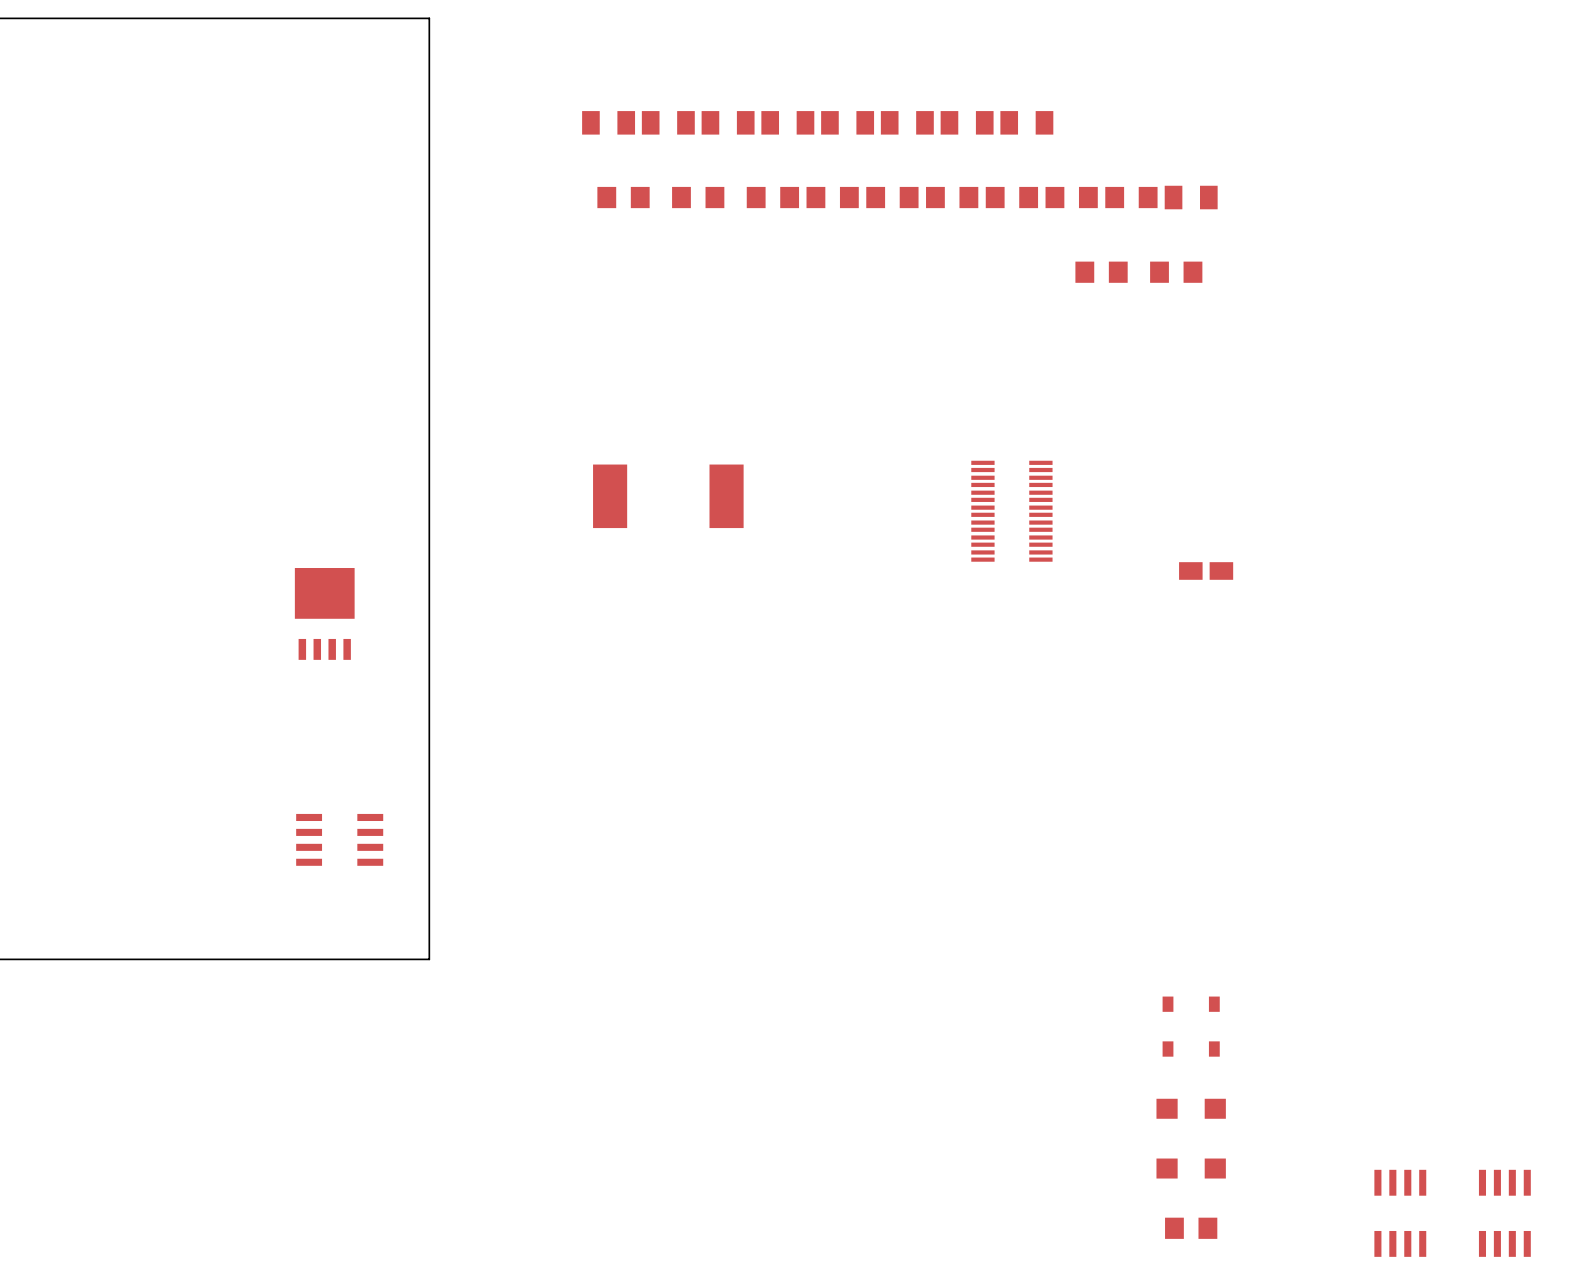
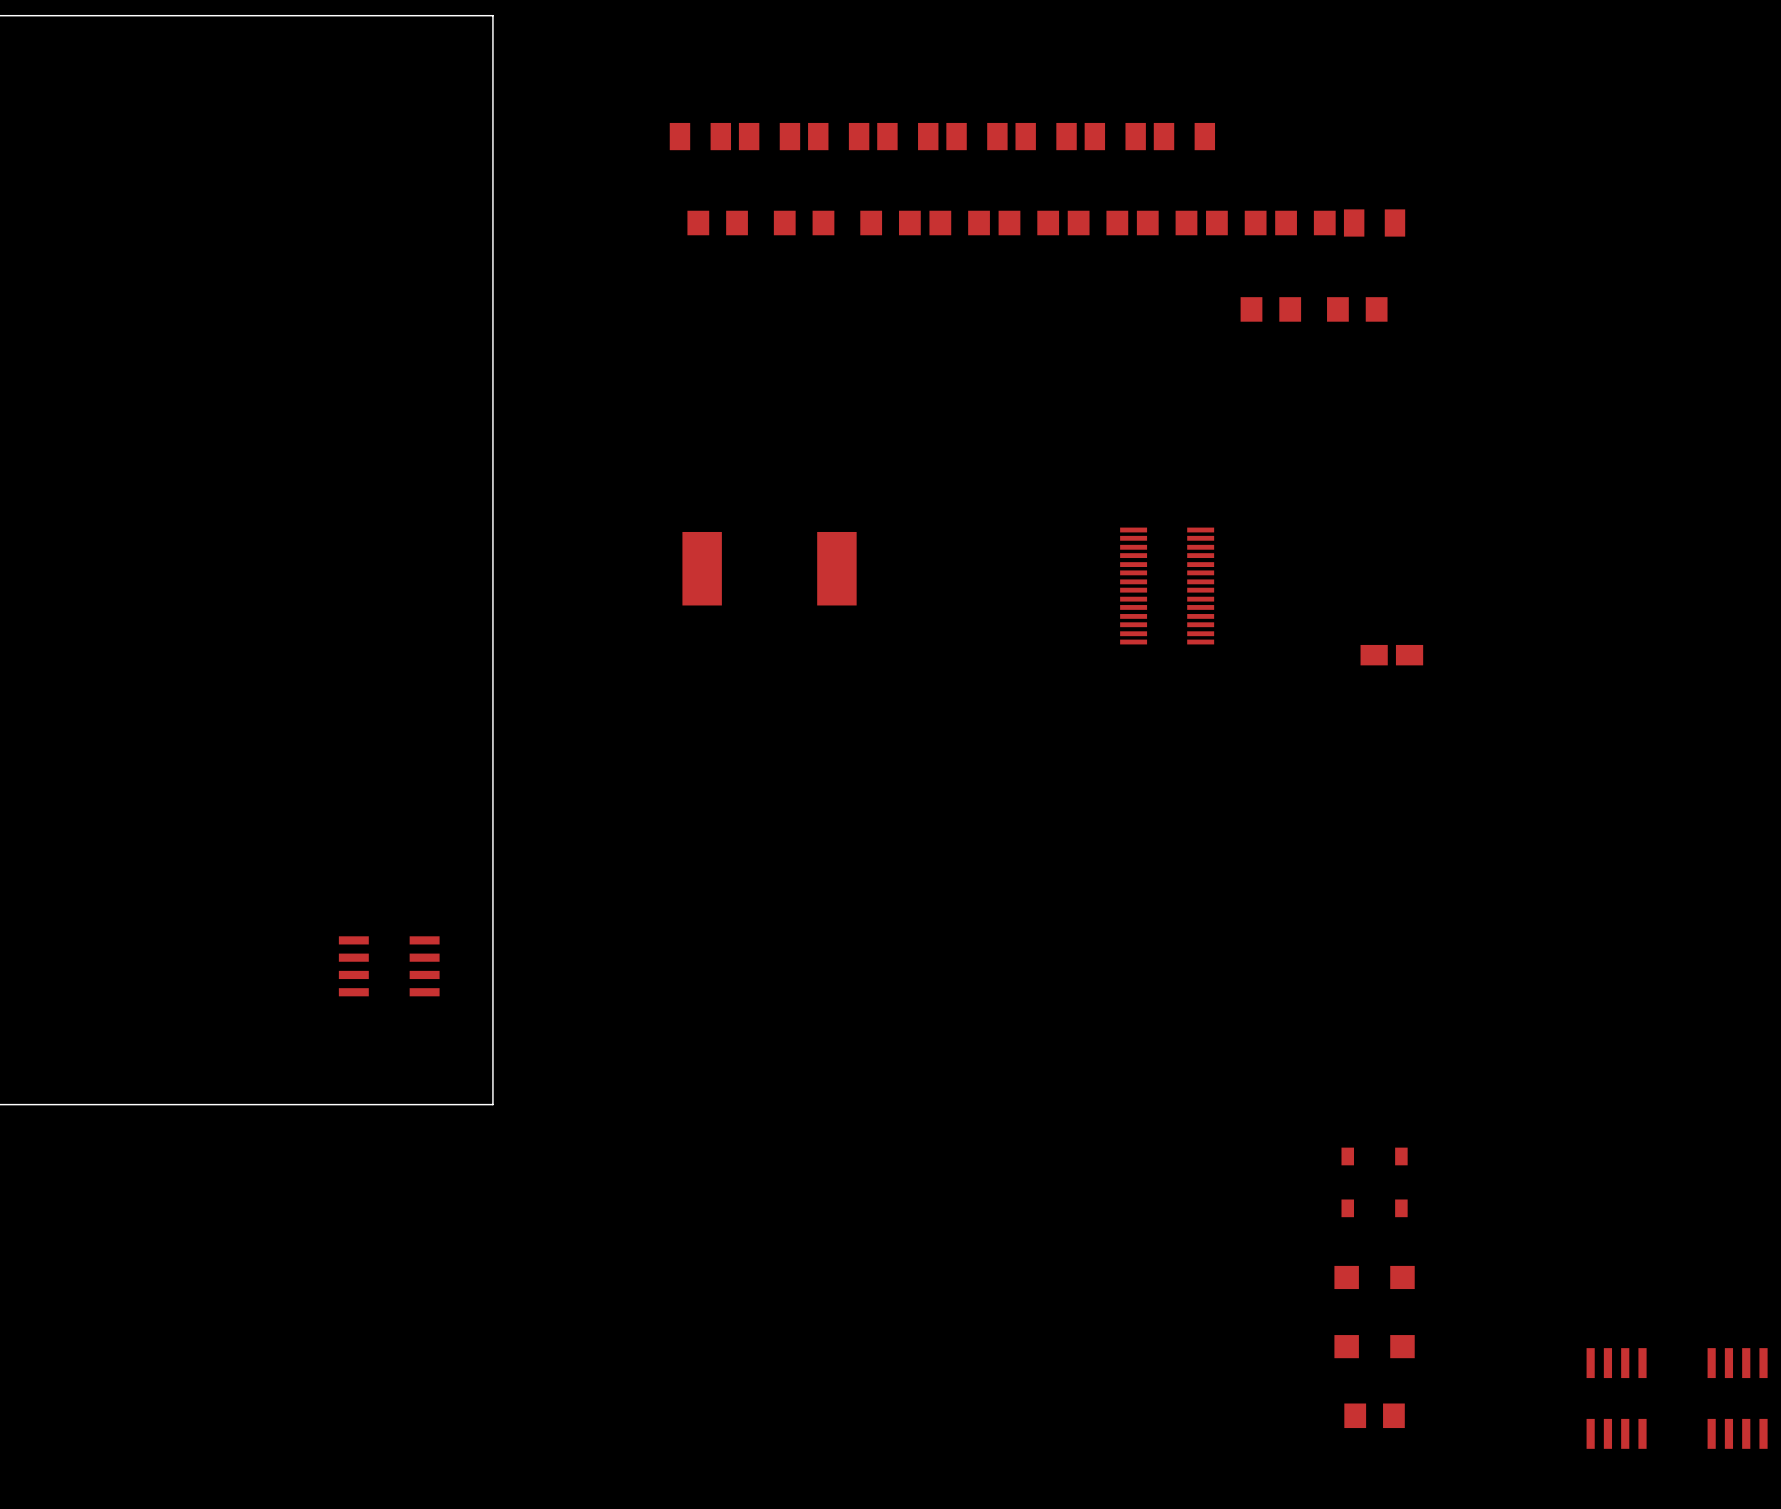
part: (324, 613) -> none

